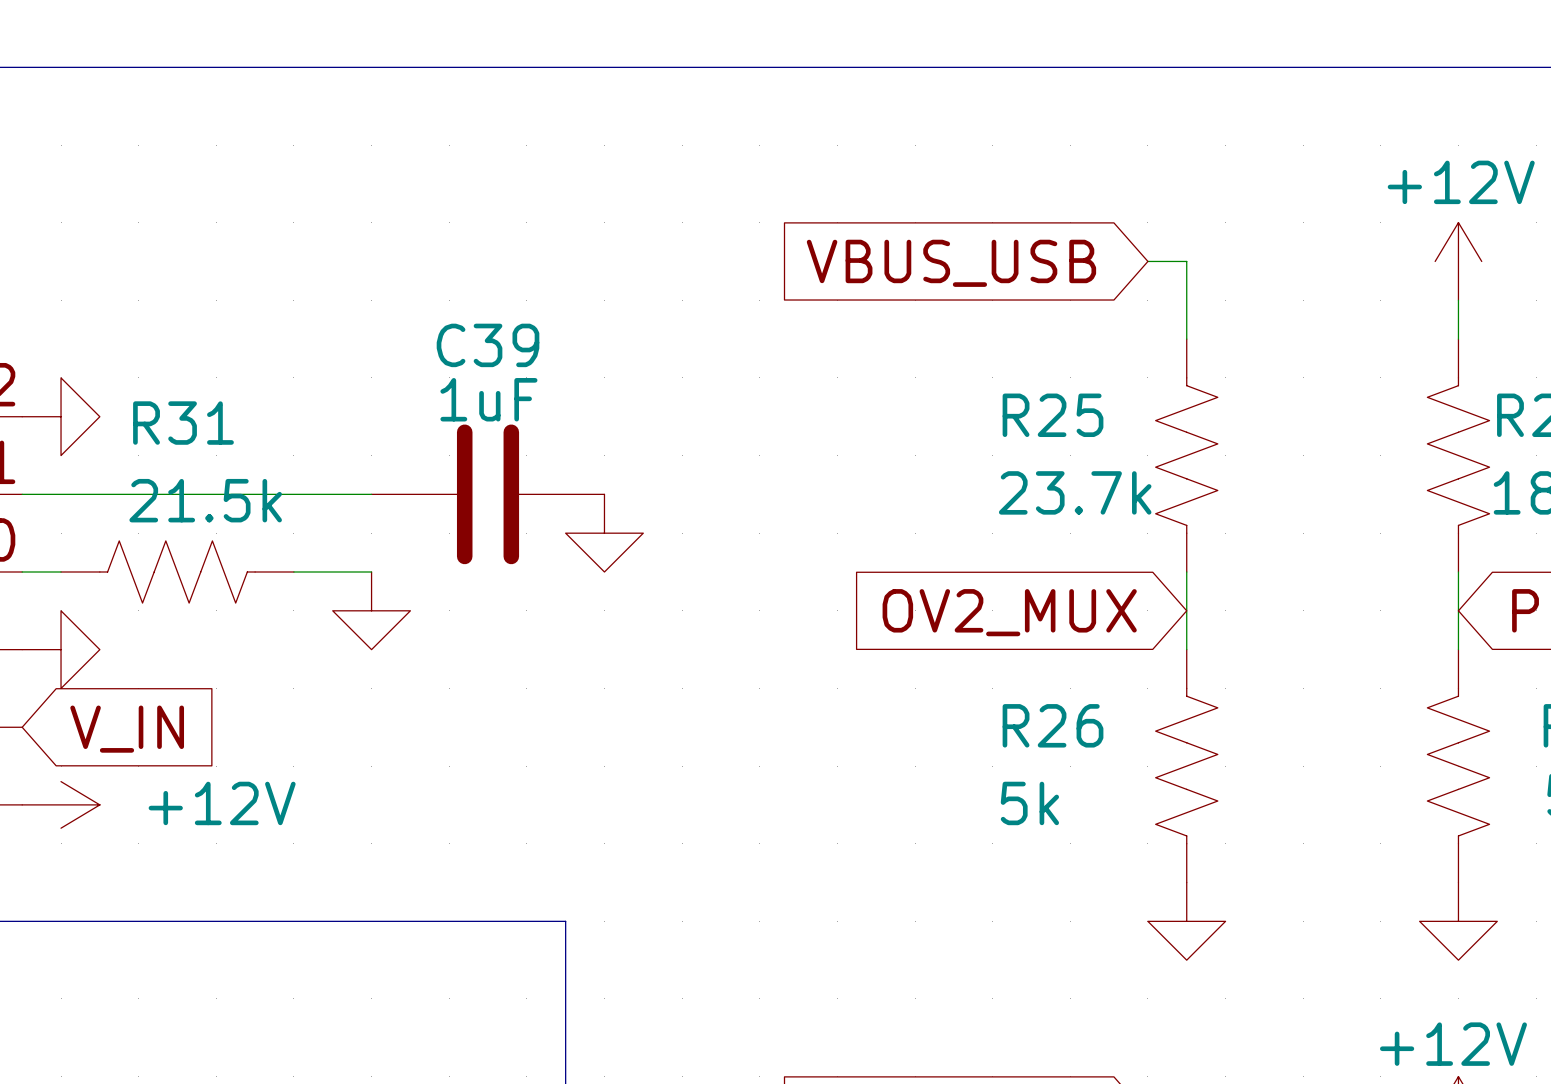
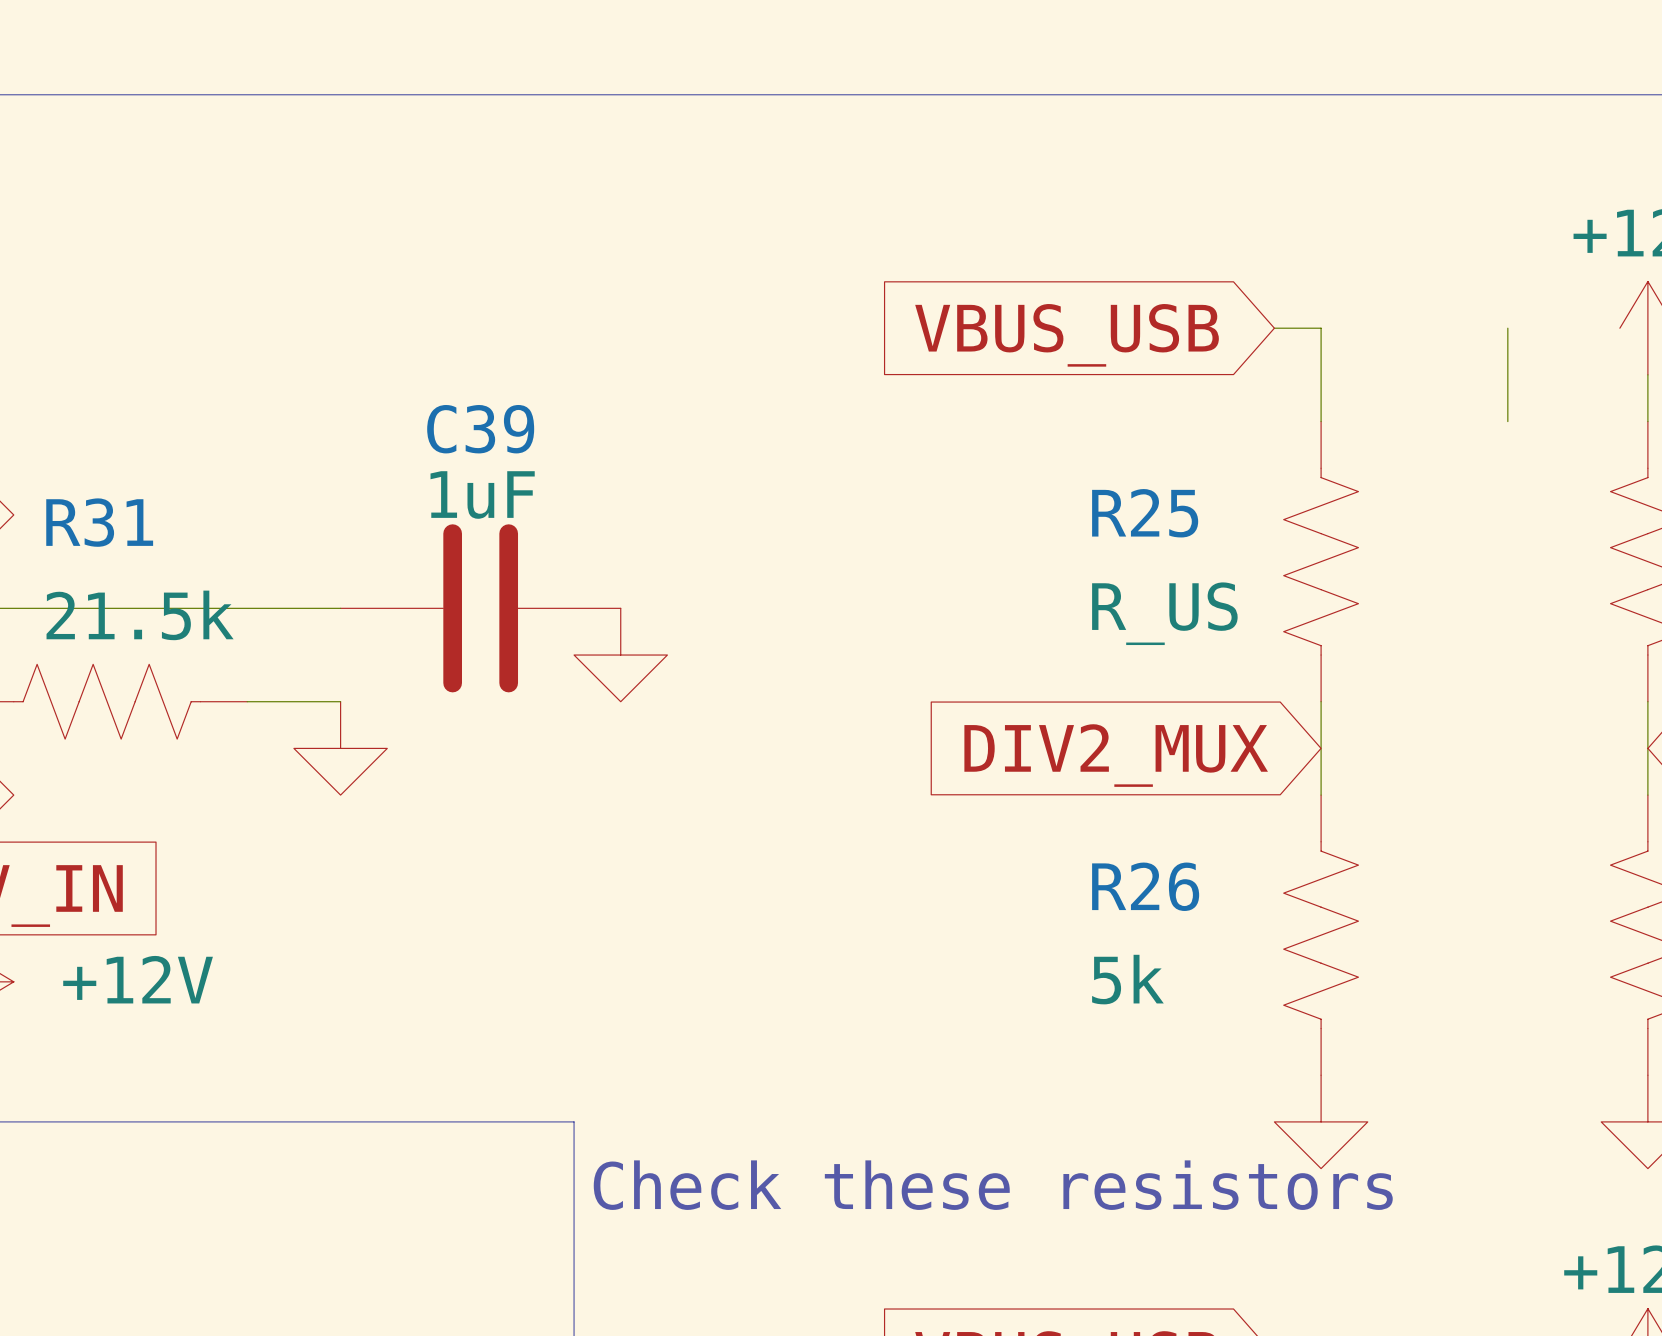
wire: none -> (1507, 328) (1507, 421)
R25 value: 23.7k (1075, 492) -> R_US (1164, 613)
global label: OV2_MUX (1009, 612) -> DIV2_MUX (1116, 755)
text: none -> Check these resistors (993, 1185)

